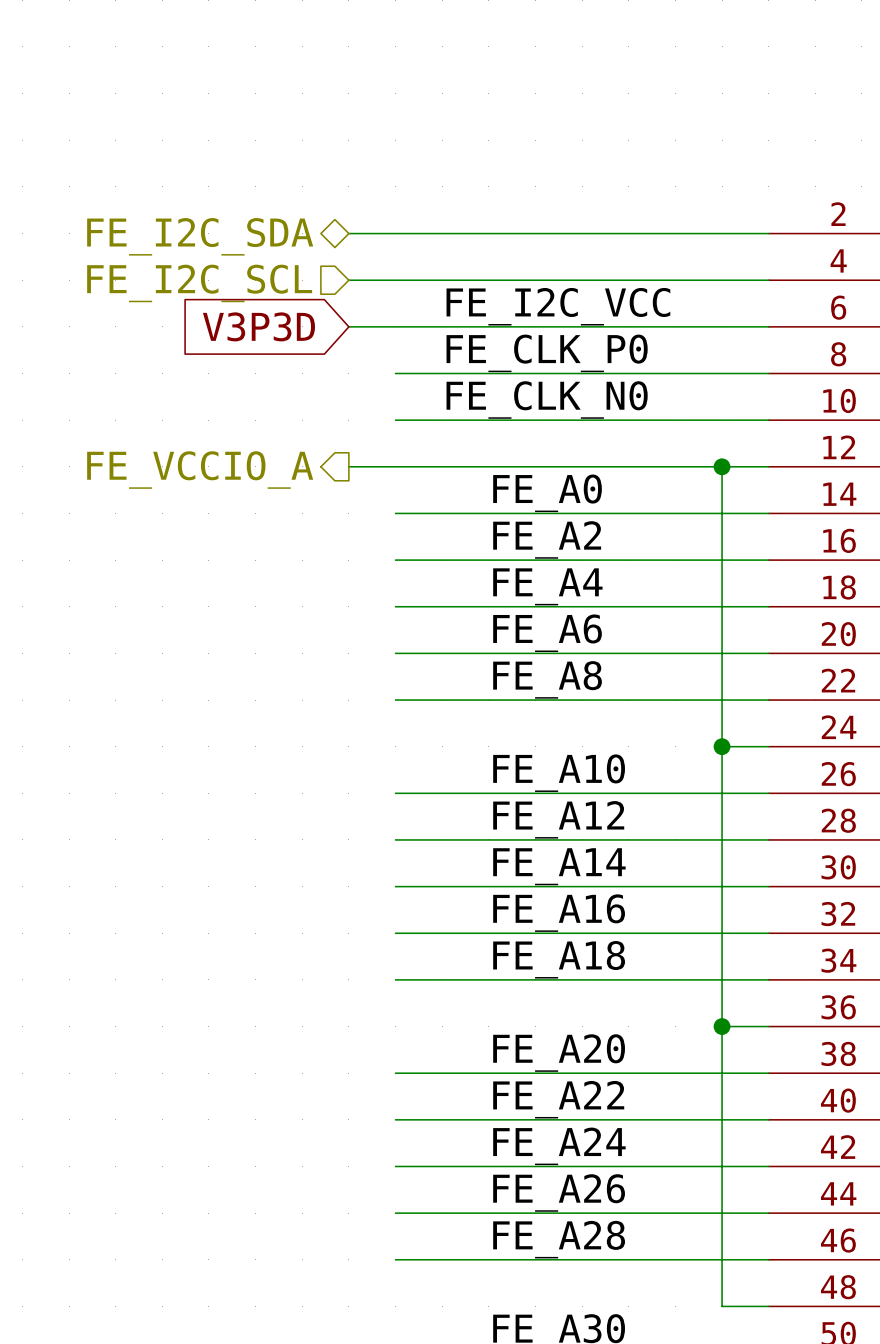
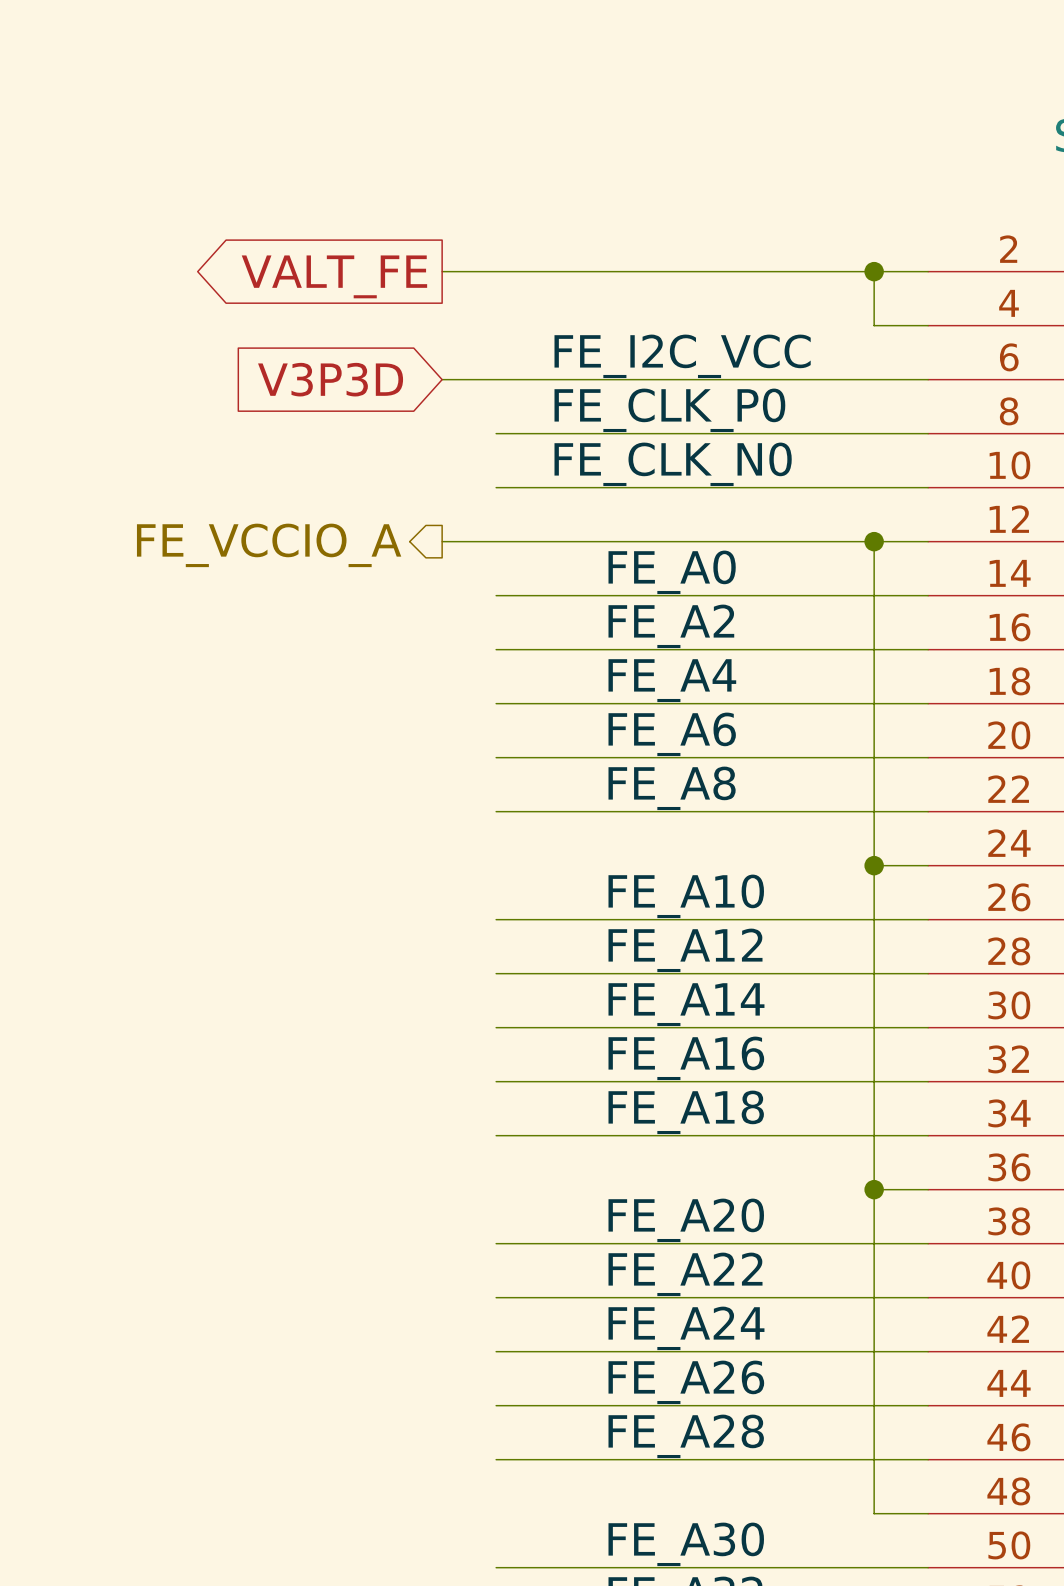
junction: none -> (874, 271)
hierarchical label: FE_I2C_SDA (200, 236) -> none
global label: none -> VALT_FE (334, 276)
wire: (348, 280) (722, 280) -> (874, 271) (874, 325)
hierarchical label: FE_I2C_SCL (199, 283) -> none

